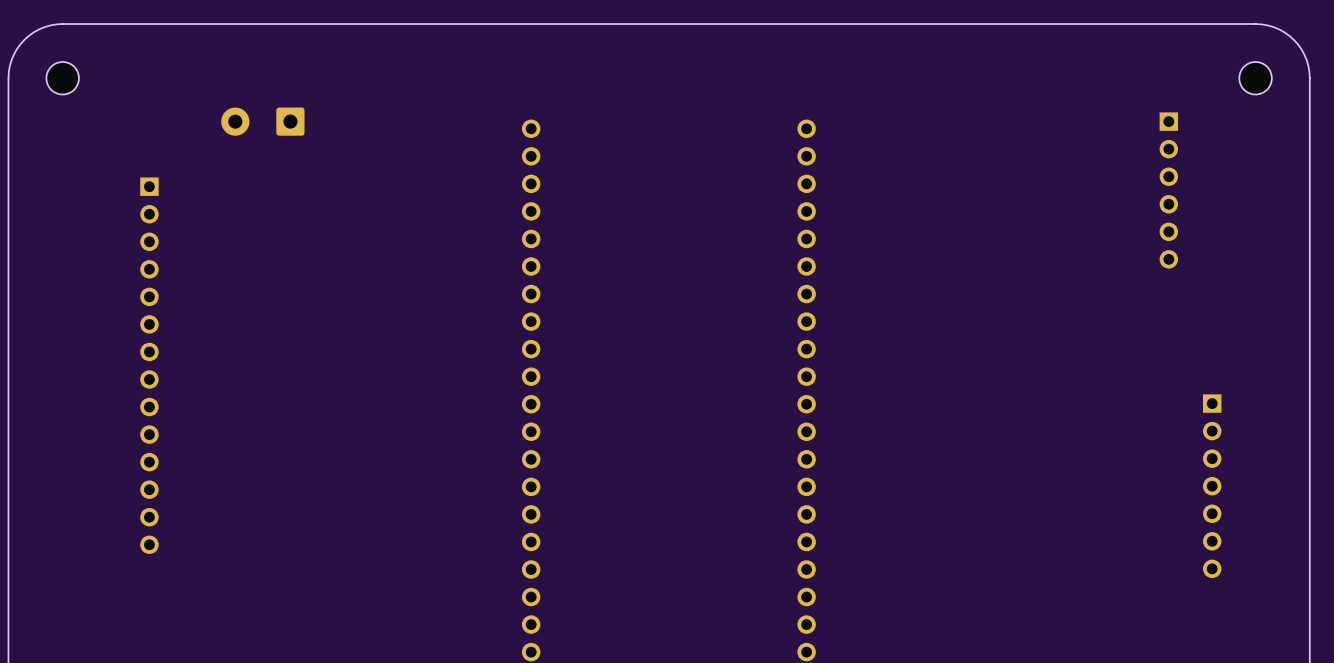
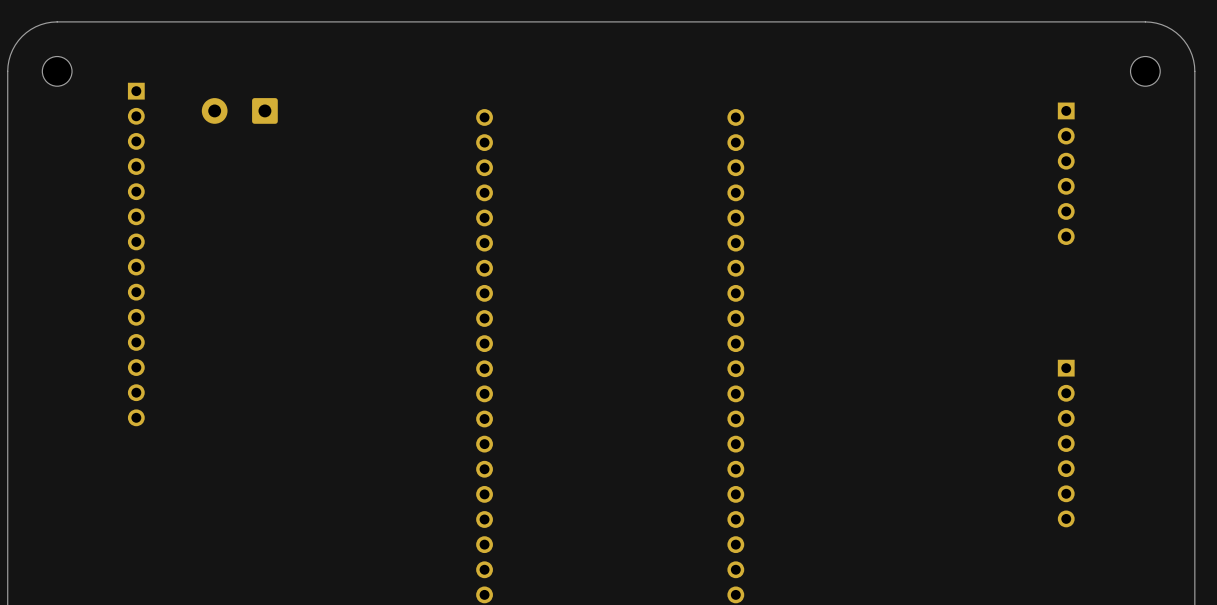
part position: (149, 365) -> (136, 254)
part position: (1212, 486) -> (1066, 443)

